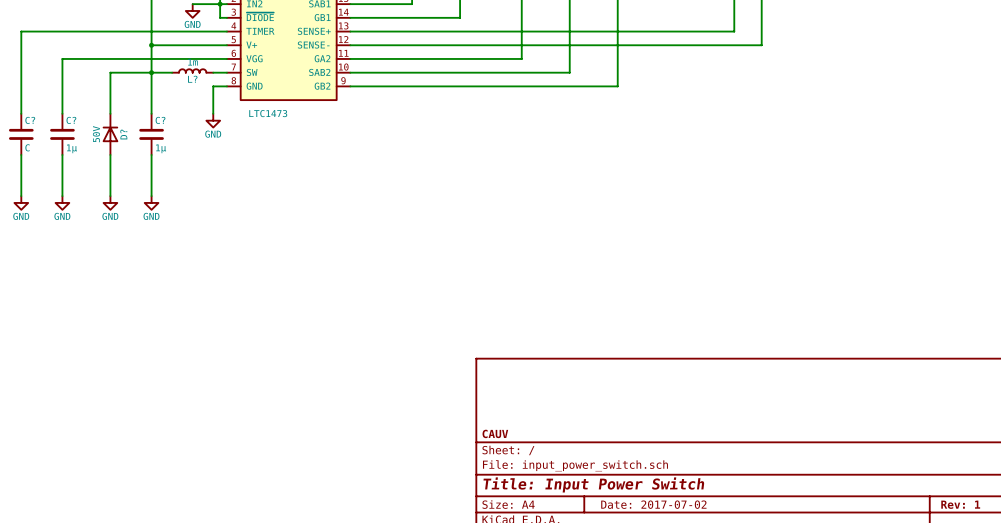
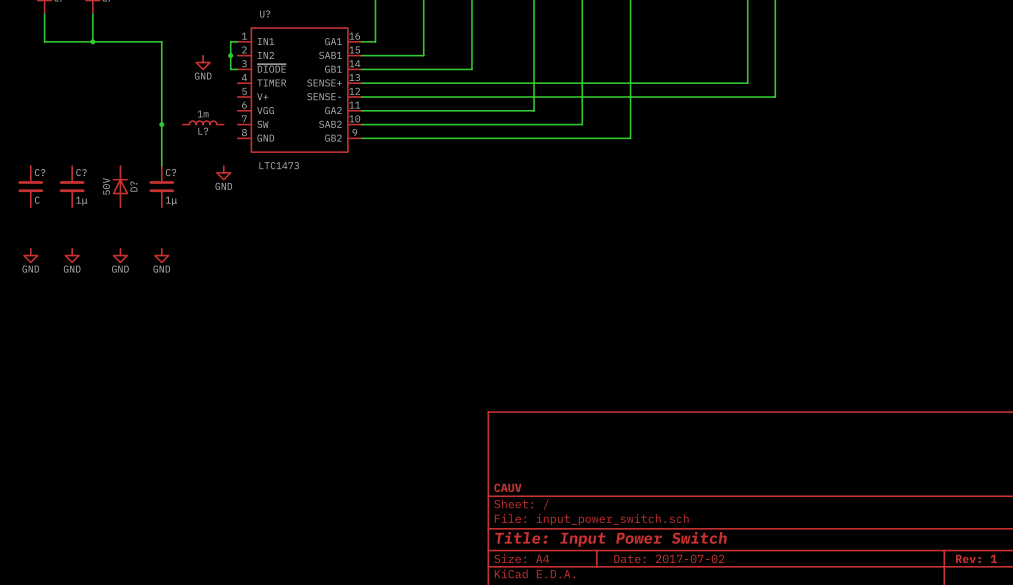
wire: (192, 4) (226, 4) -> none
wire: (226, 31) (21, 31) (21, 113) -> none
wire: (151, 45) (226, 45) -> none
junction: (151, 45) -> none
wire: (226, 58) (62, 58) (62, 113) -> none
wire: (172, 72) (110, 72) (110, 113) -> none
wire: (213, 72) (226, 72) -> none
wire: (226, 86) (213, 86) (213, 113) -> none
wire: (21, 154) (21, 196) -> none
wire: (62, 154) (62, 196) -> none
wire: (110, 154) (110, 196) -> none
wire: (151, 154) (151, 196) -> none

